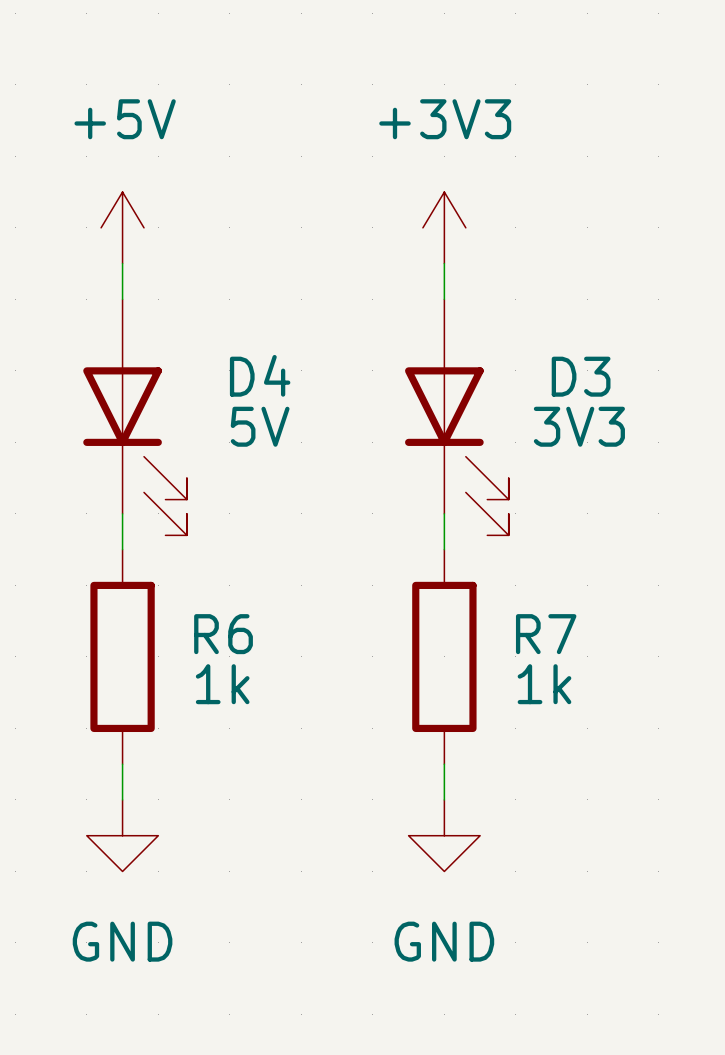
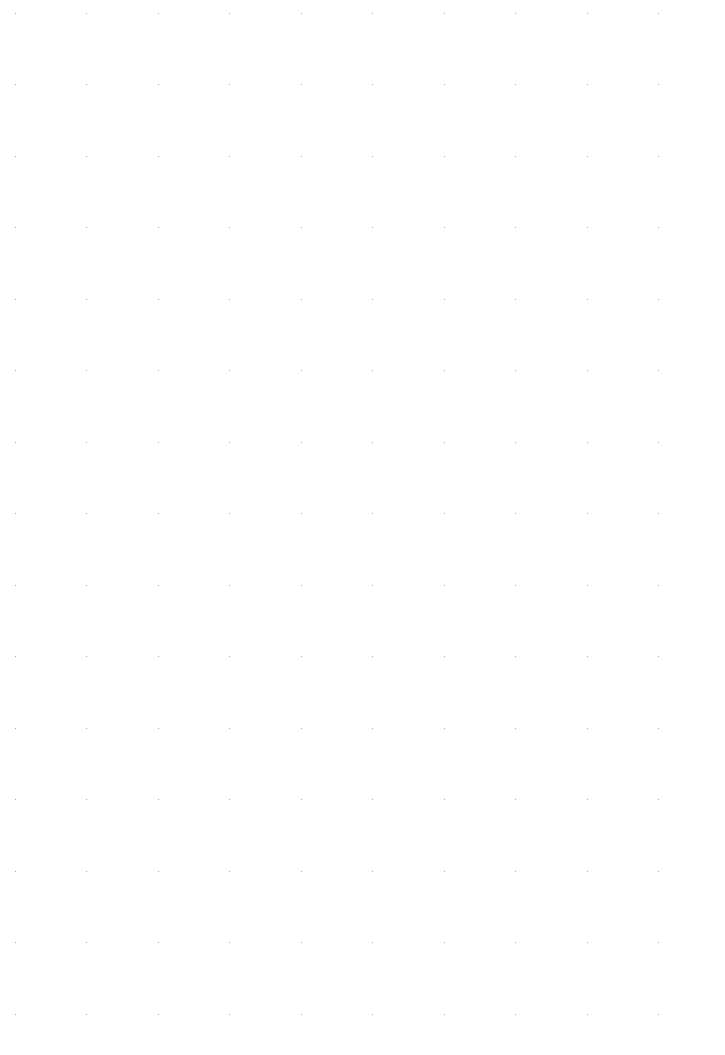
power symbol: +5V (122, 227) -> none
power symbol: +3V3 (444, 227) -> none
wire: (122, 263) (122, 299) -> none
wire: (444, 263) (444, 299) -> none
D4: 5V (135, 417) -> none
D3: 3V3 (456, 417) -> none
wire: (122, 513) (122, 549) -> none
wire: (444, 513) (444, 549) -> none
R6: 1k (122, 656) -> none
R7: 1k (444, 656) -> none
wire: (122, 764) (122, 799) -> none
wire: (444, 764) (444, 799) -> none
power symbol: GND (122, 835) -> none
power symbol: GND (444, 835) -> none

